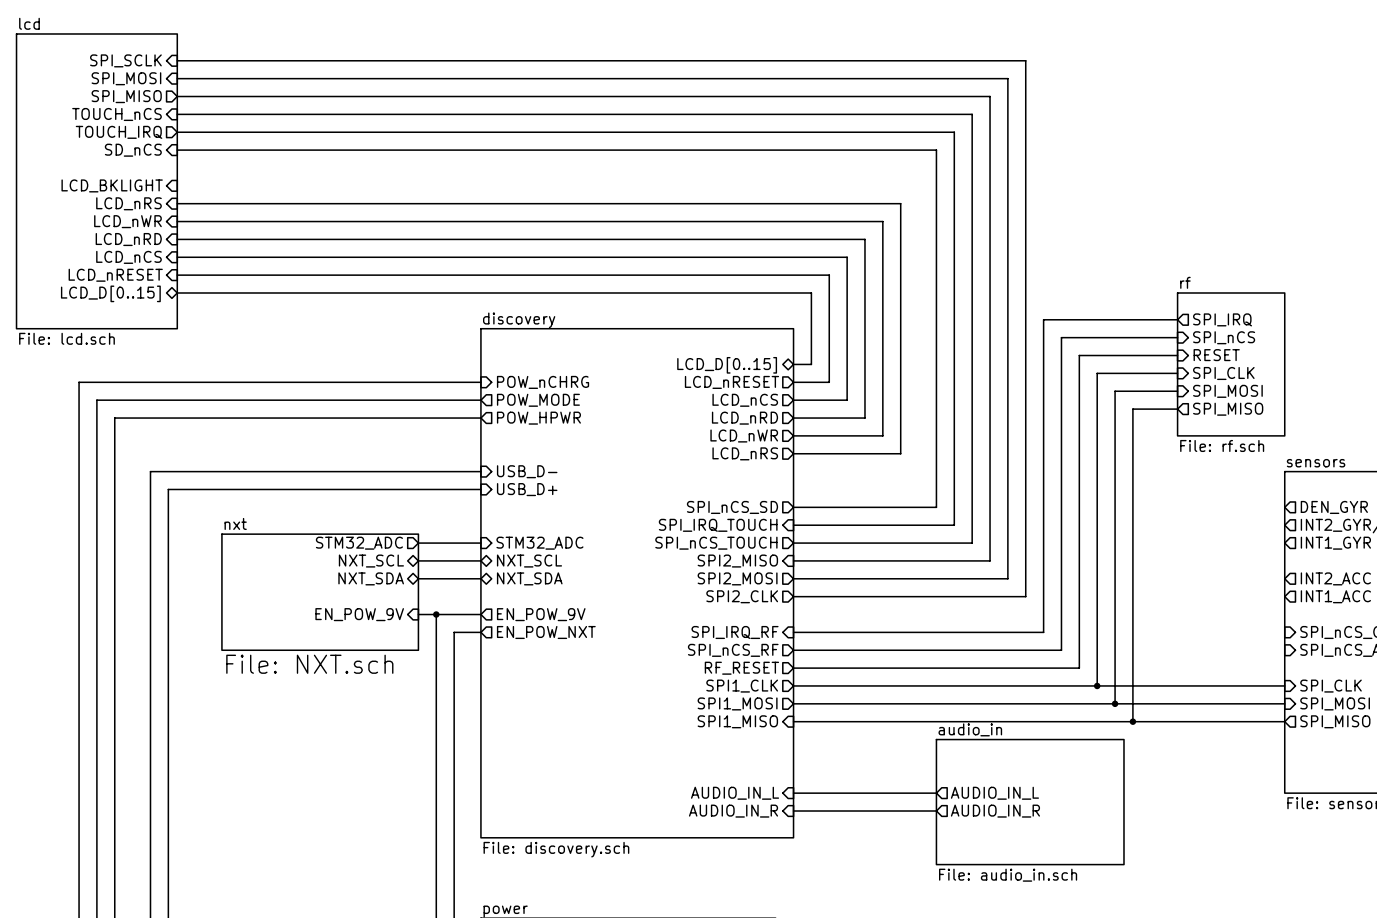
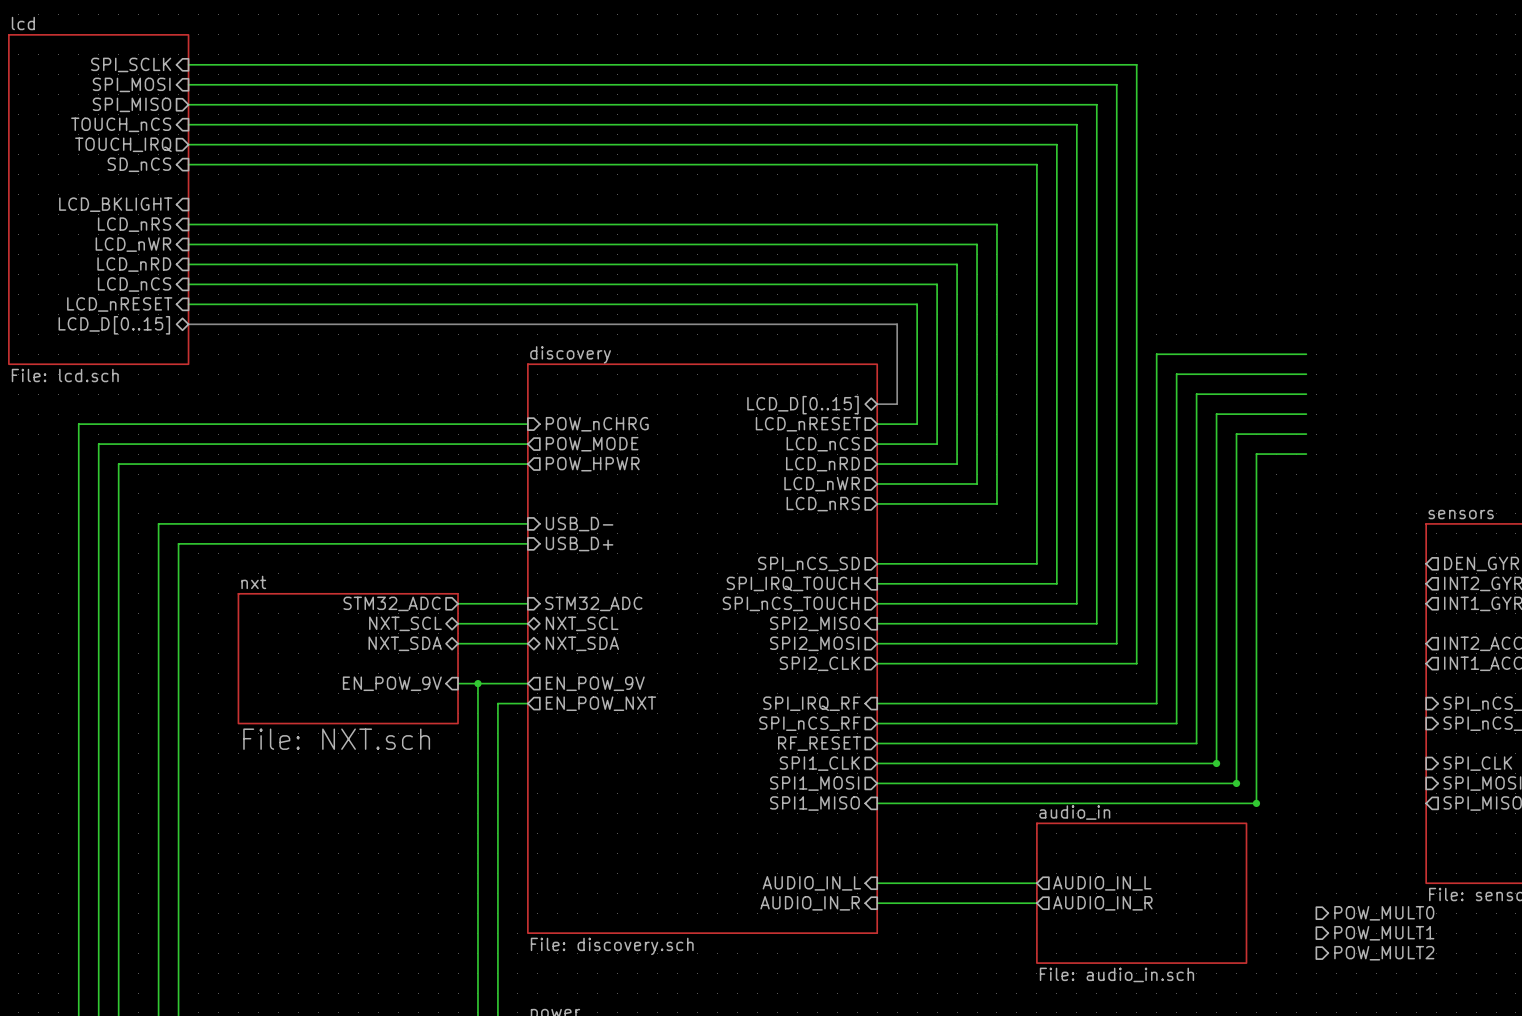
sheet pin: SPI_IRQ (1222, 319) -> none
sheet pin: SPI_nCS (1224, 337) -> none
sheet pin: RESET (1216, 355) -> none
sheet rf: File: rf.sch (1231, 364) -> none
sheet pin: SPI_CLK (1223, 373) -> none
sheet pin: SPI_MOSI (1227, 391) -> none
sheet pin: SPI_MISO (1228, 409) -> none
wire: (1097, 685) (1284, 685) -> none
wire: (1115, 703) (1284, 703) -> none
wire: (1132, 721) (1284, 721) -> none
sheet pin: none -> POW_MULT0 (1384, 913)
sheet pin: none -> POW_MULT1 (1384, 933)
sheet pin: none -> POW_MULT2 (1384, 953)

